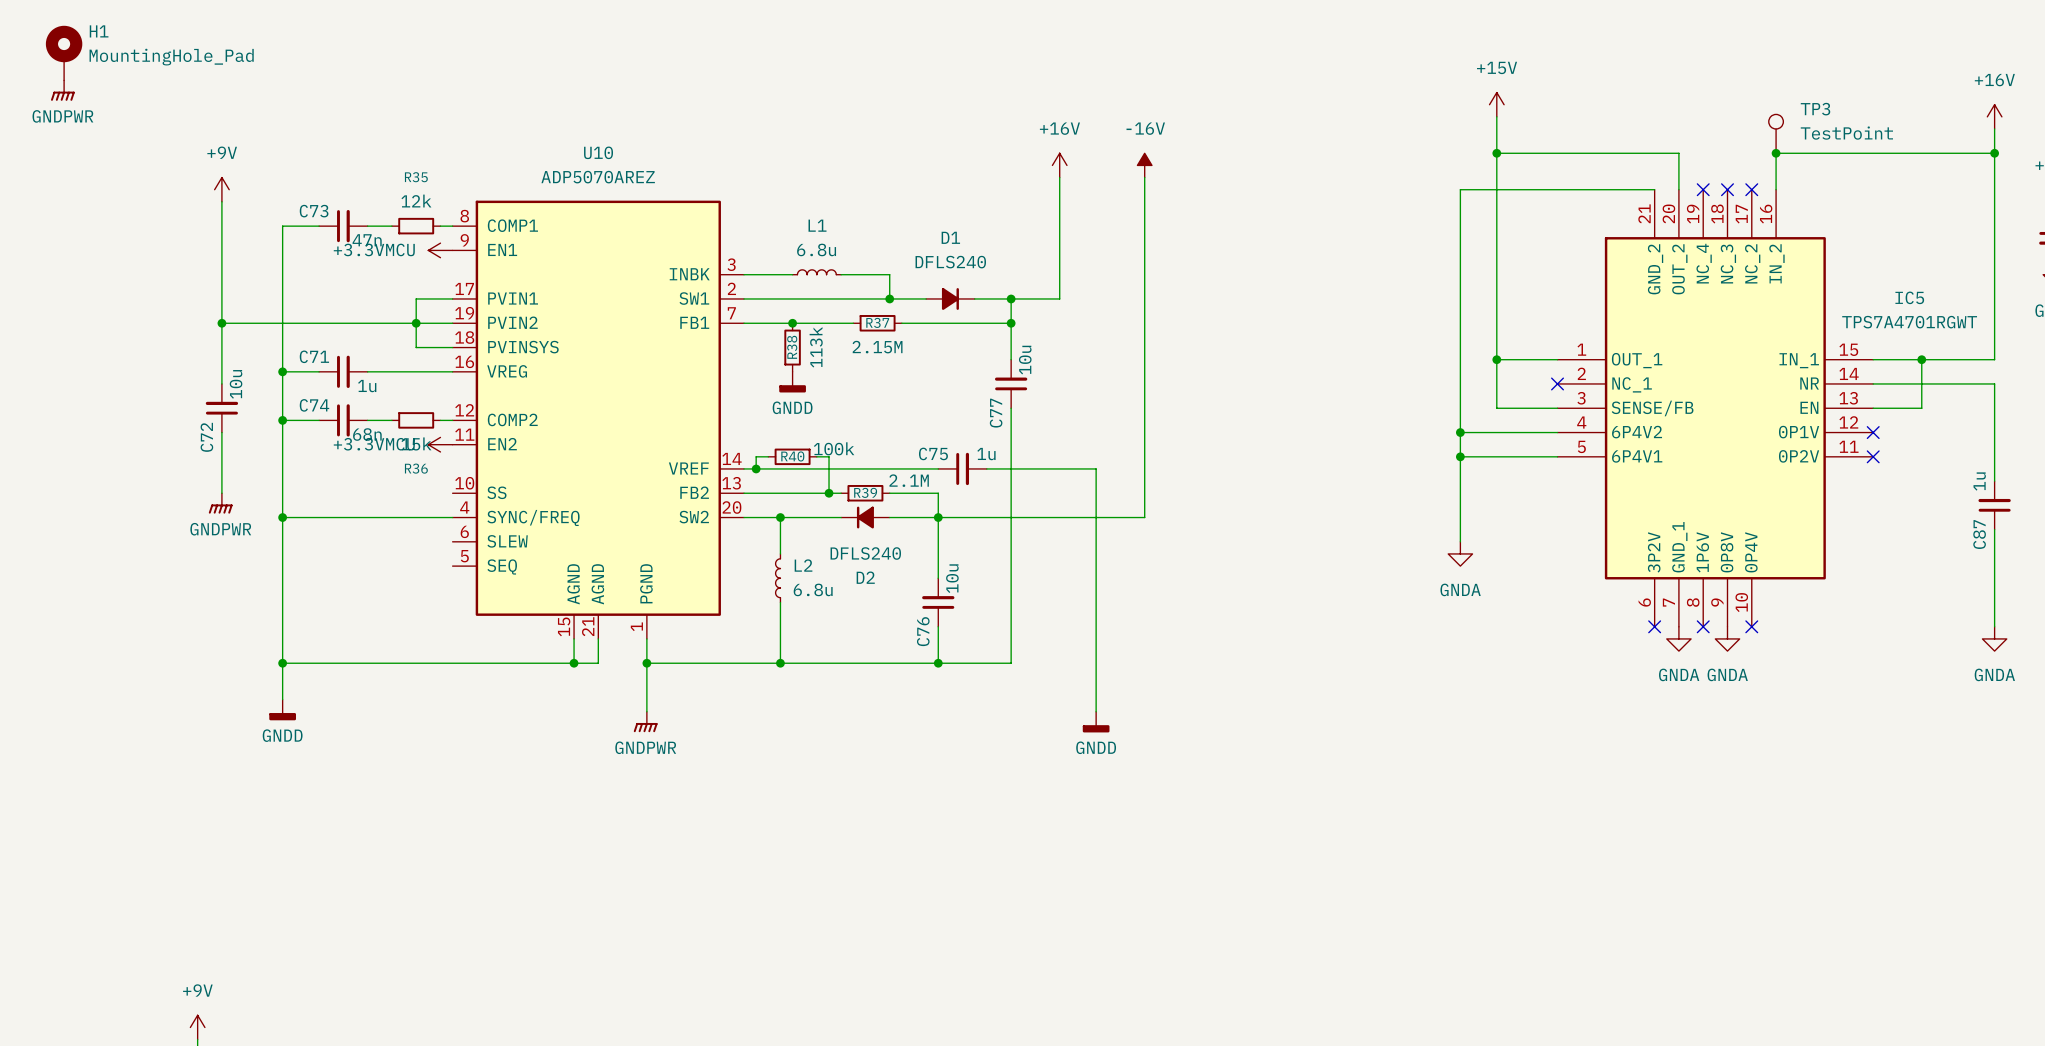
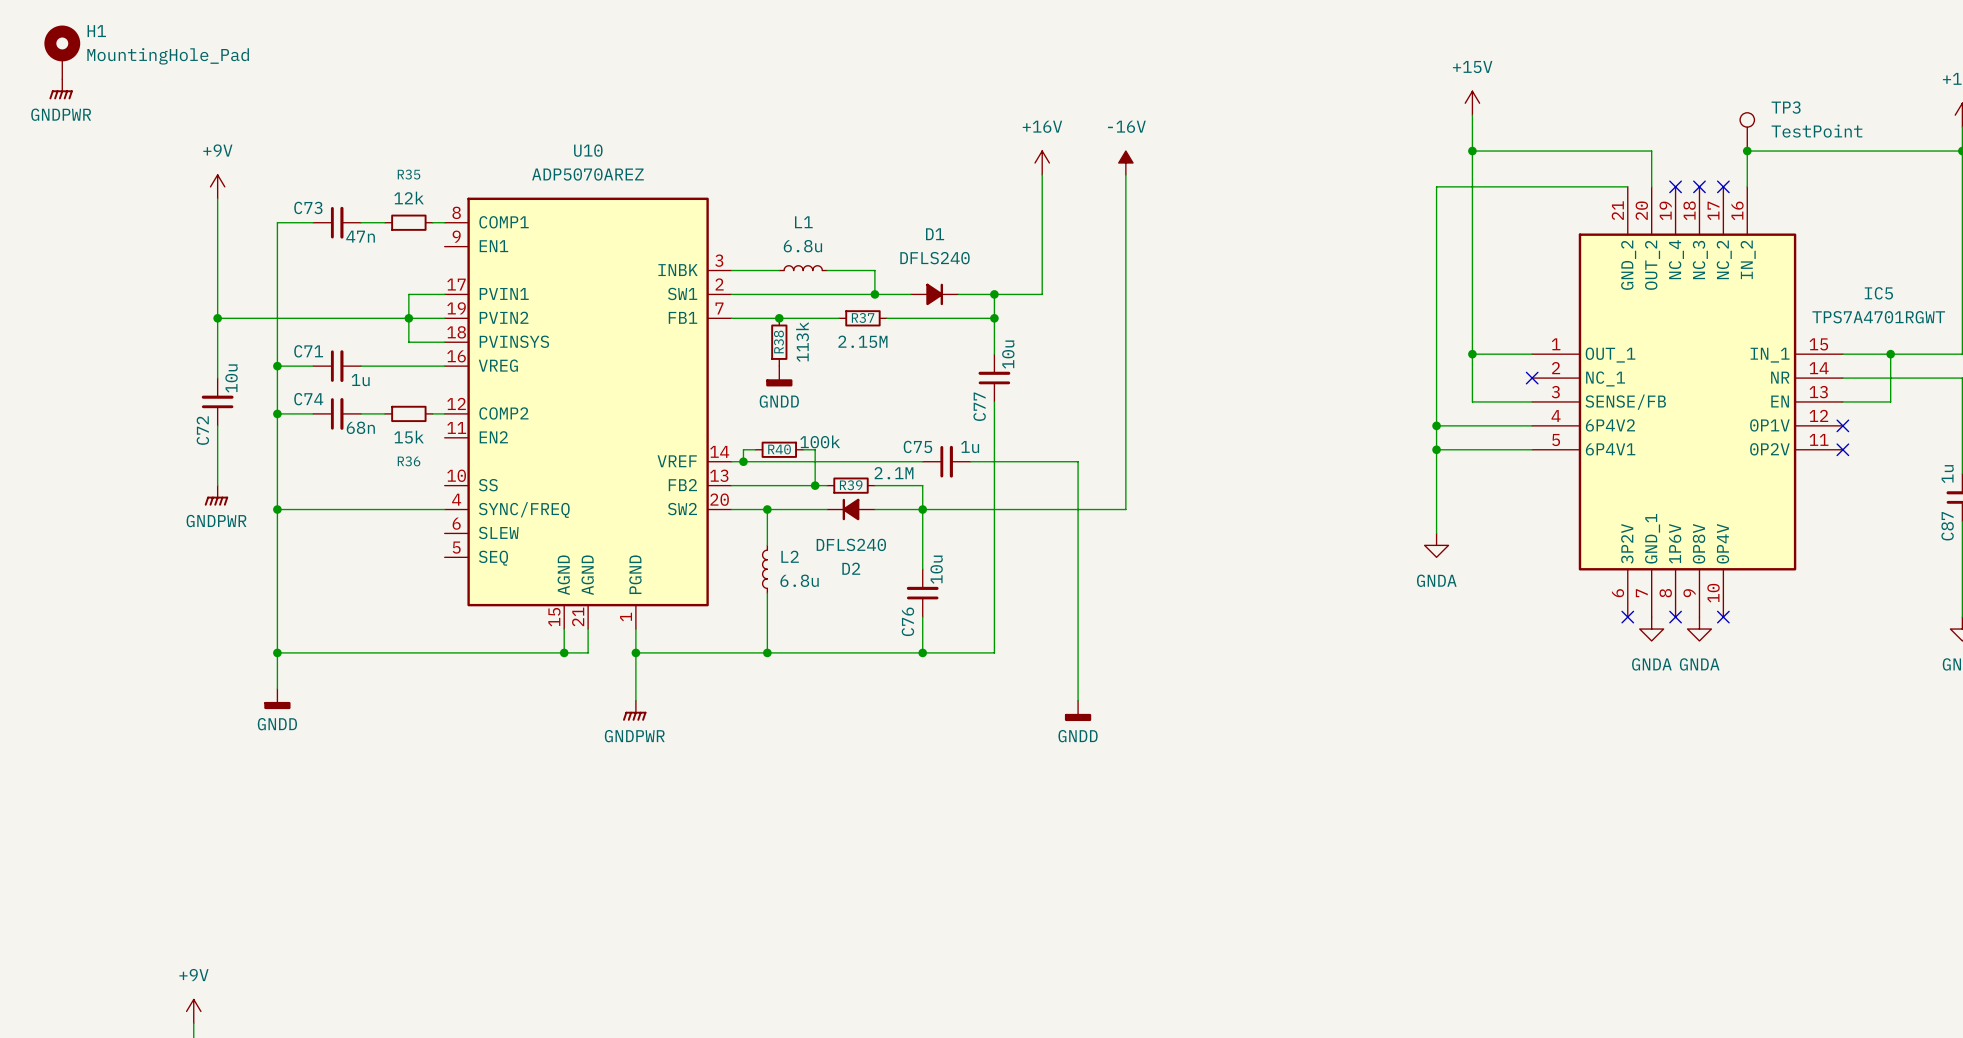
power symbol: +3.3VMCU (440, 250) -> none
power symbol: +3.3VMCU (440, 444) -> none

